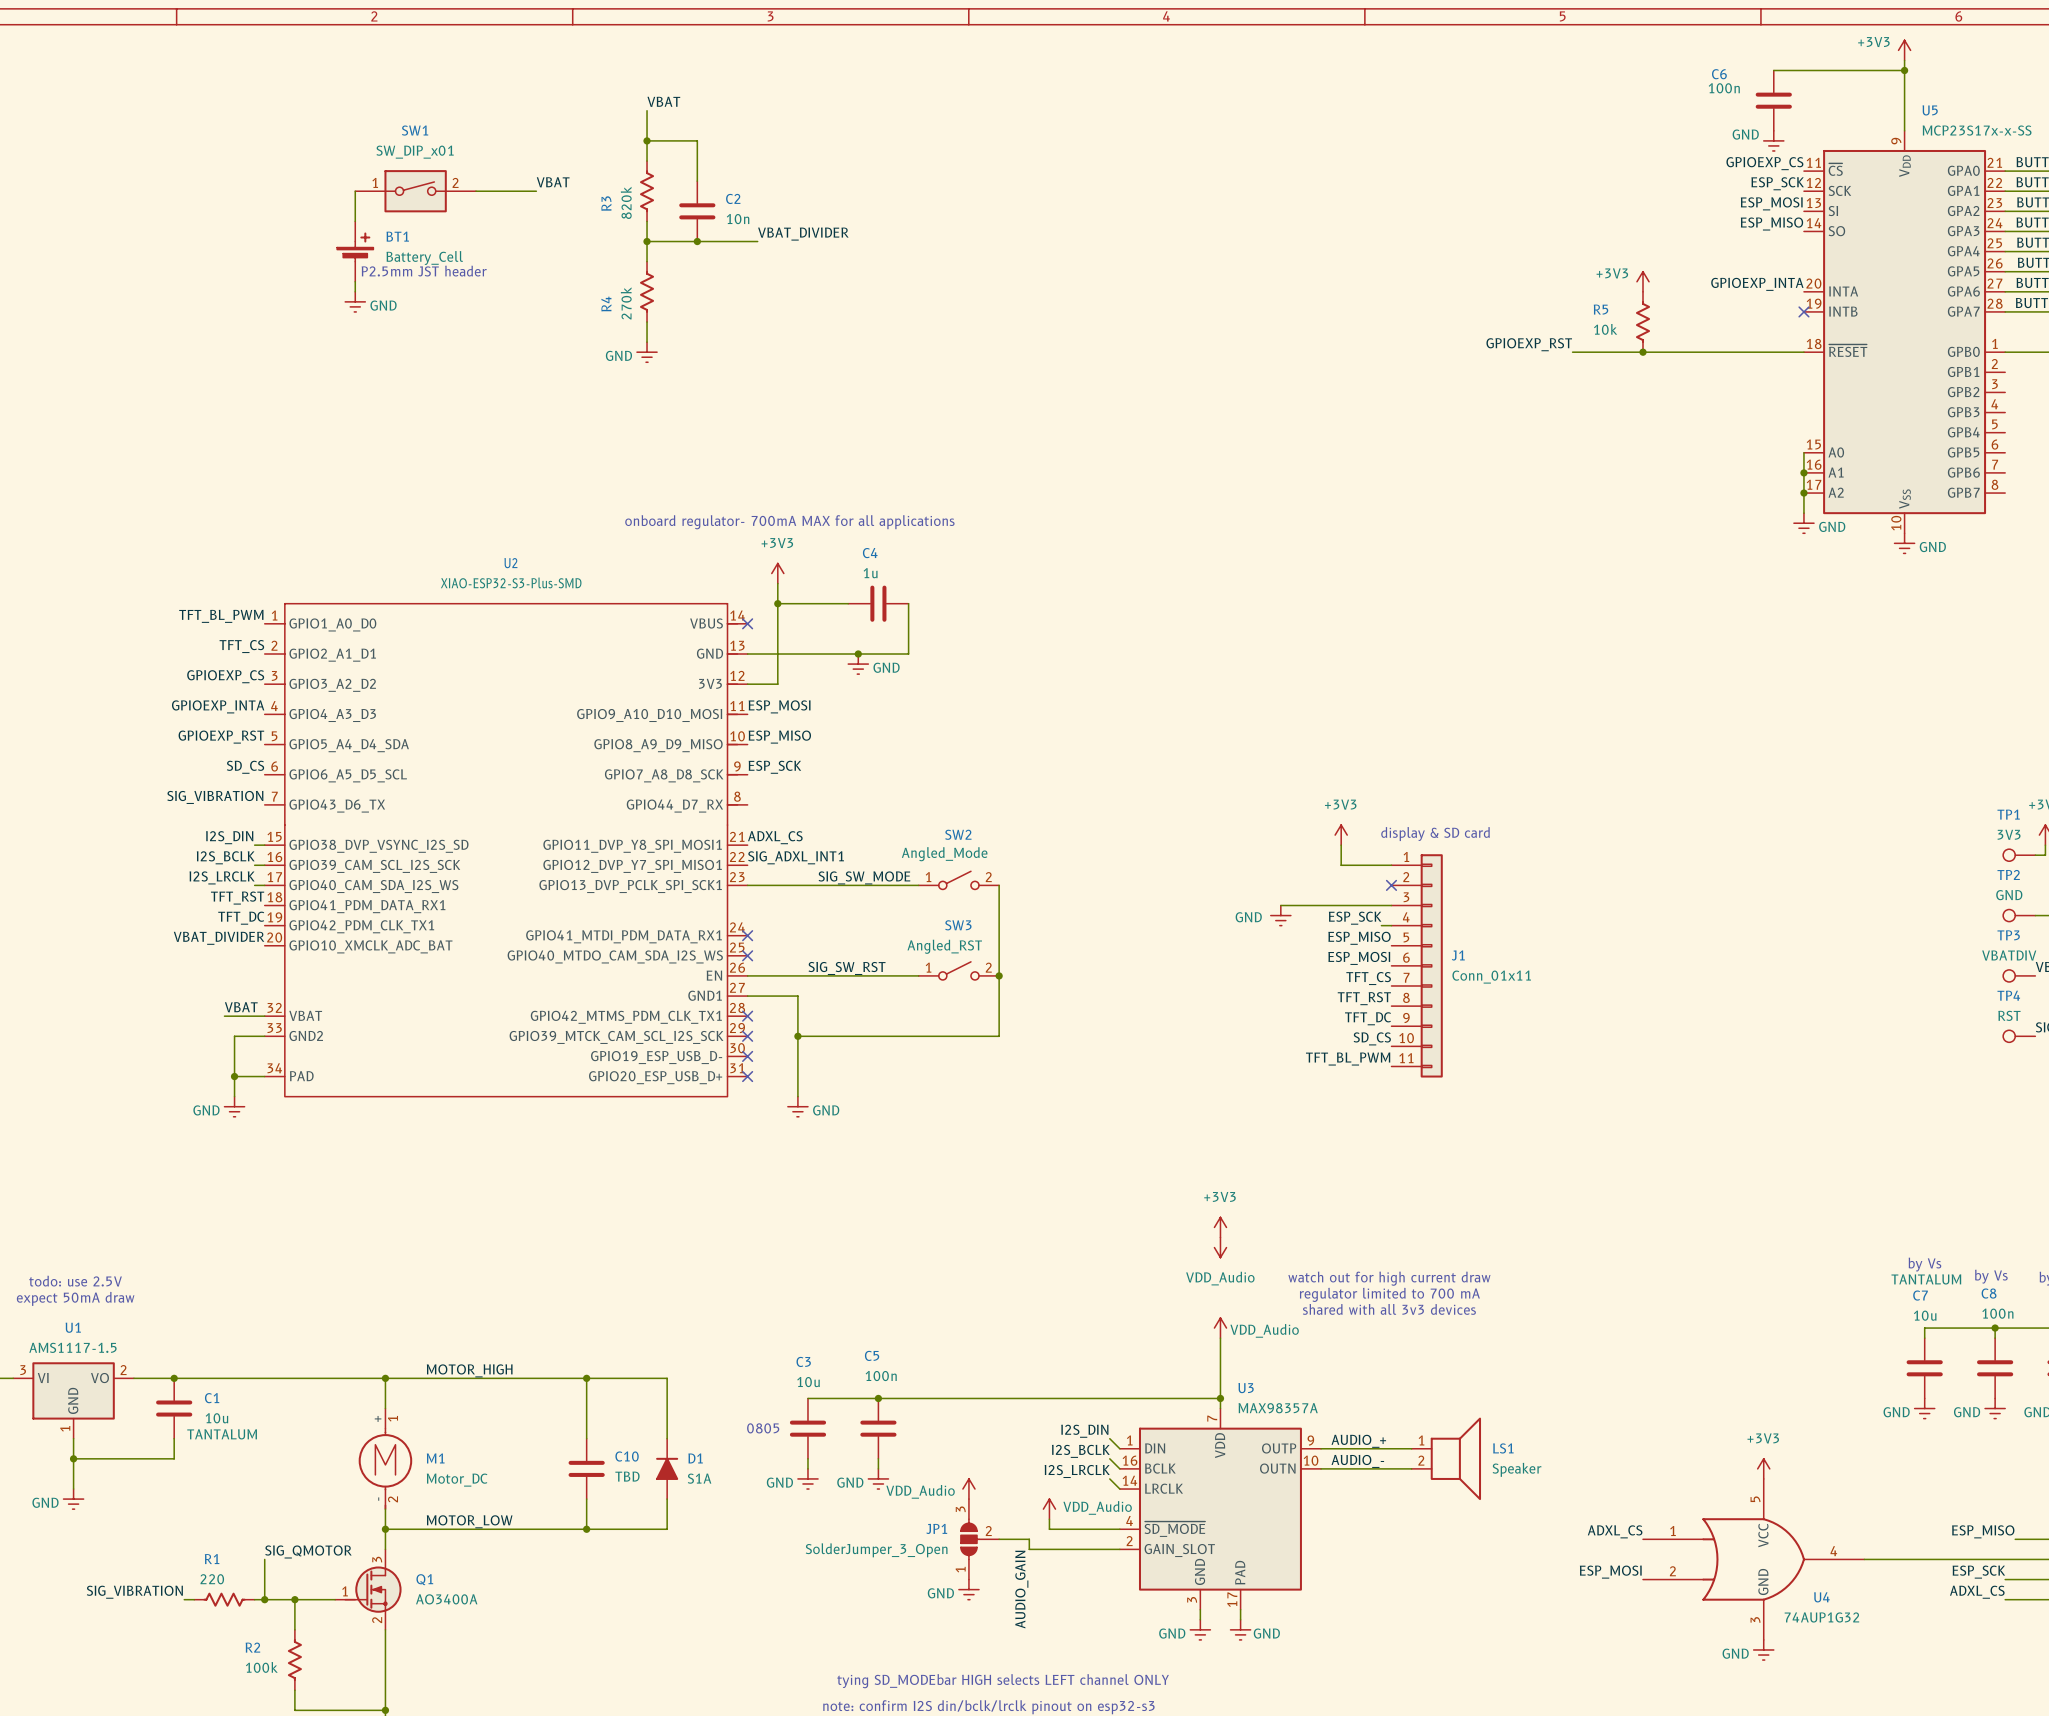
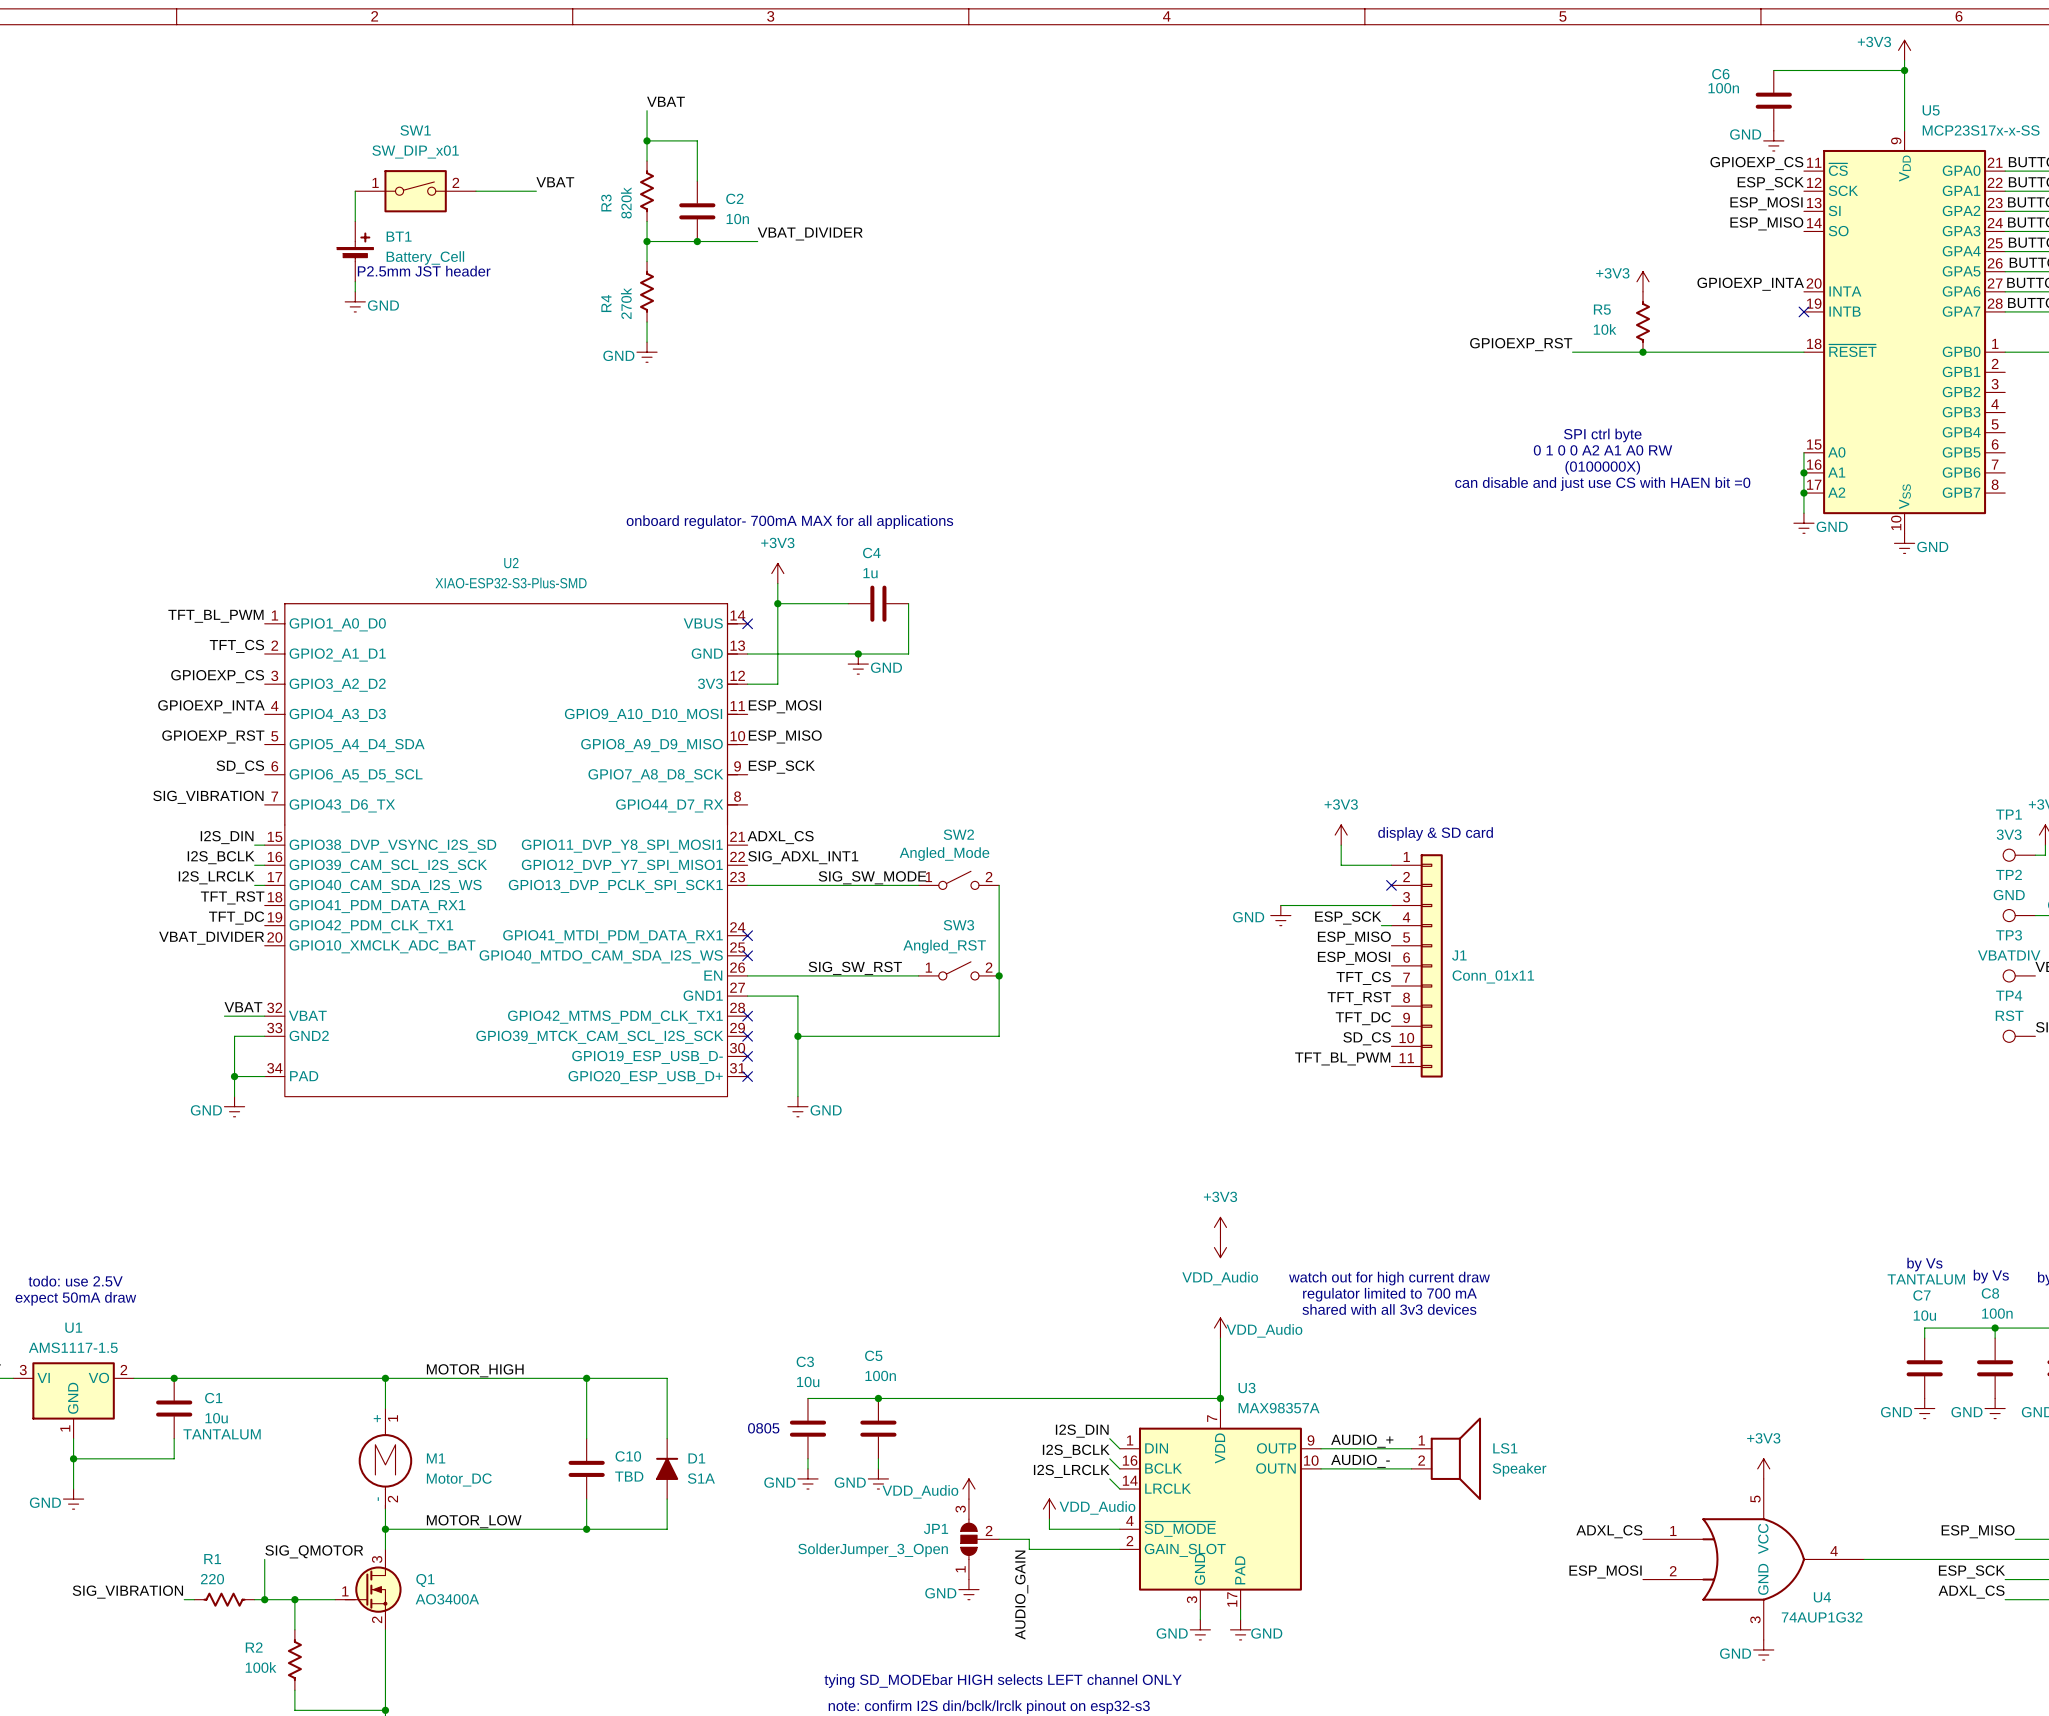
text: none -> SPI ctrl byte (1602, 435)
text: none -> 0 1 0 0 A2 A1 A0 RW (1603, 450)
text: none -> (0100000X) (1602, 467)
text: none -> can disable and just use CS with HAEN bit =0 (1602, 484)

